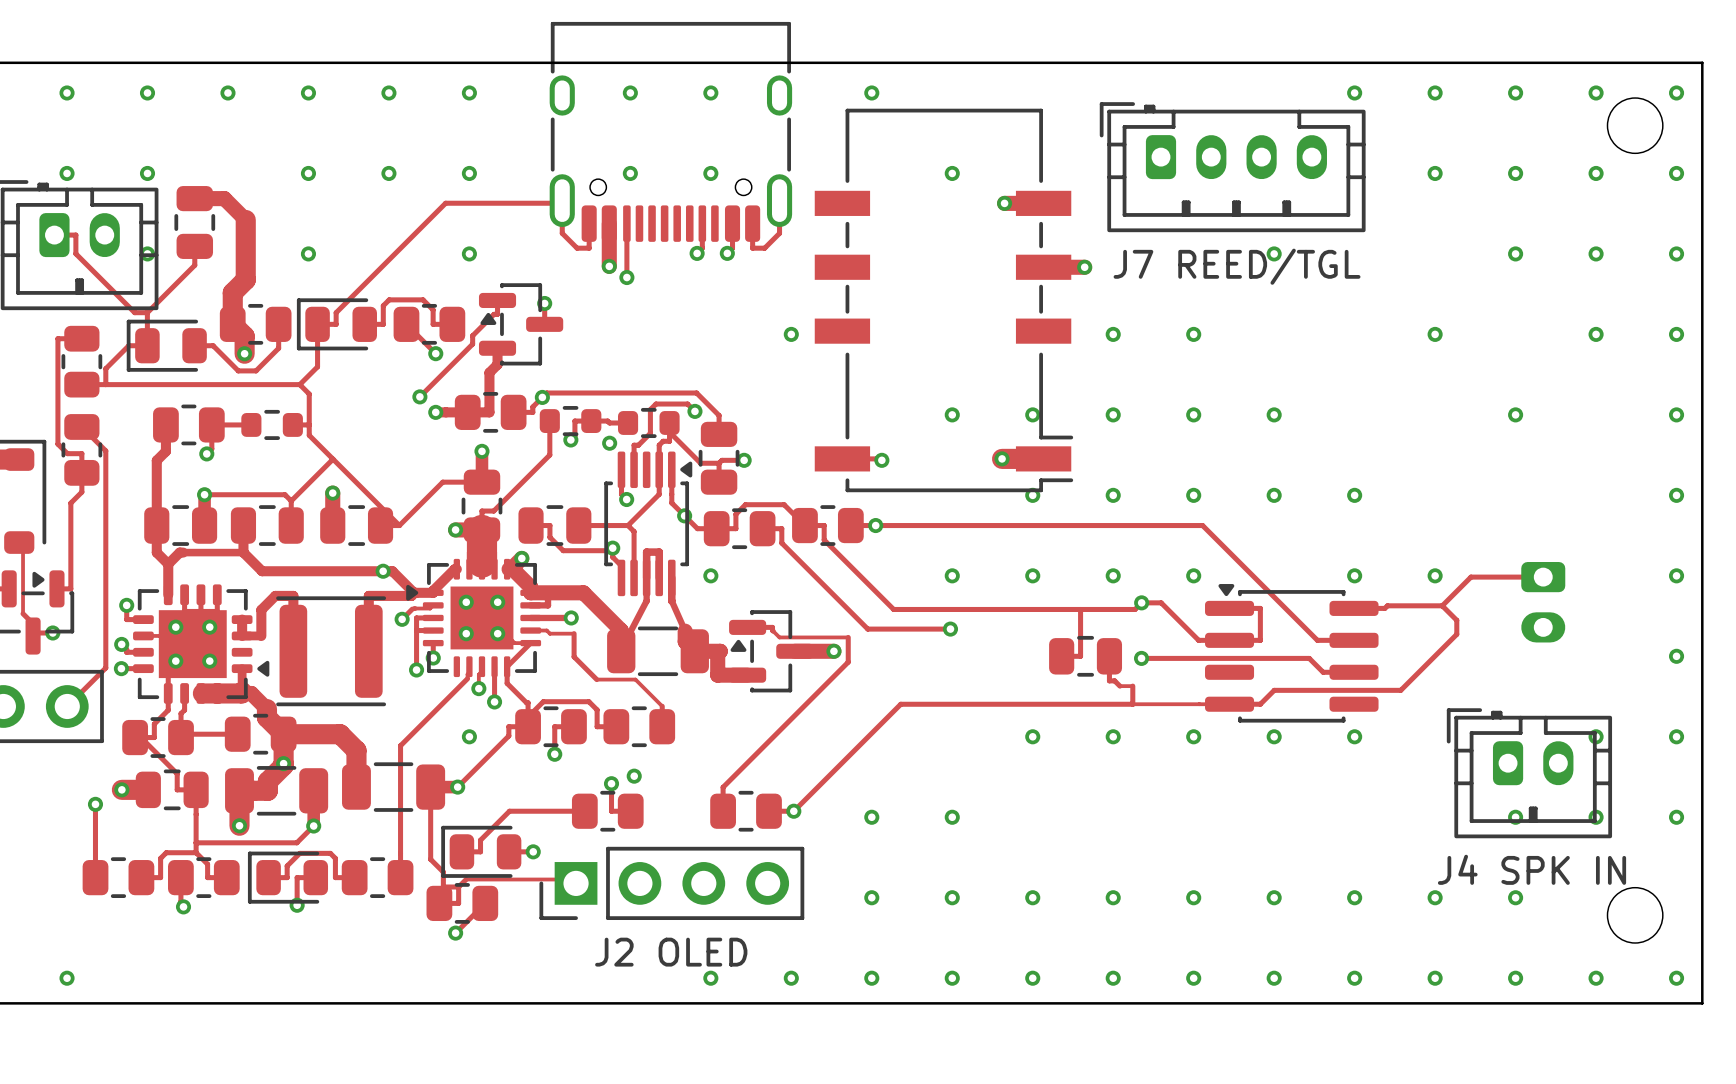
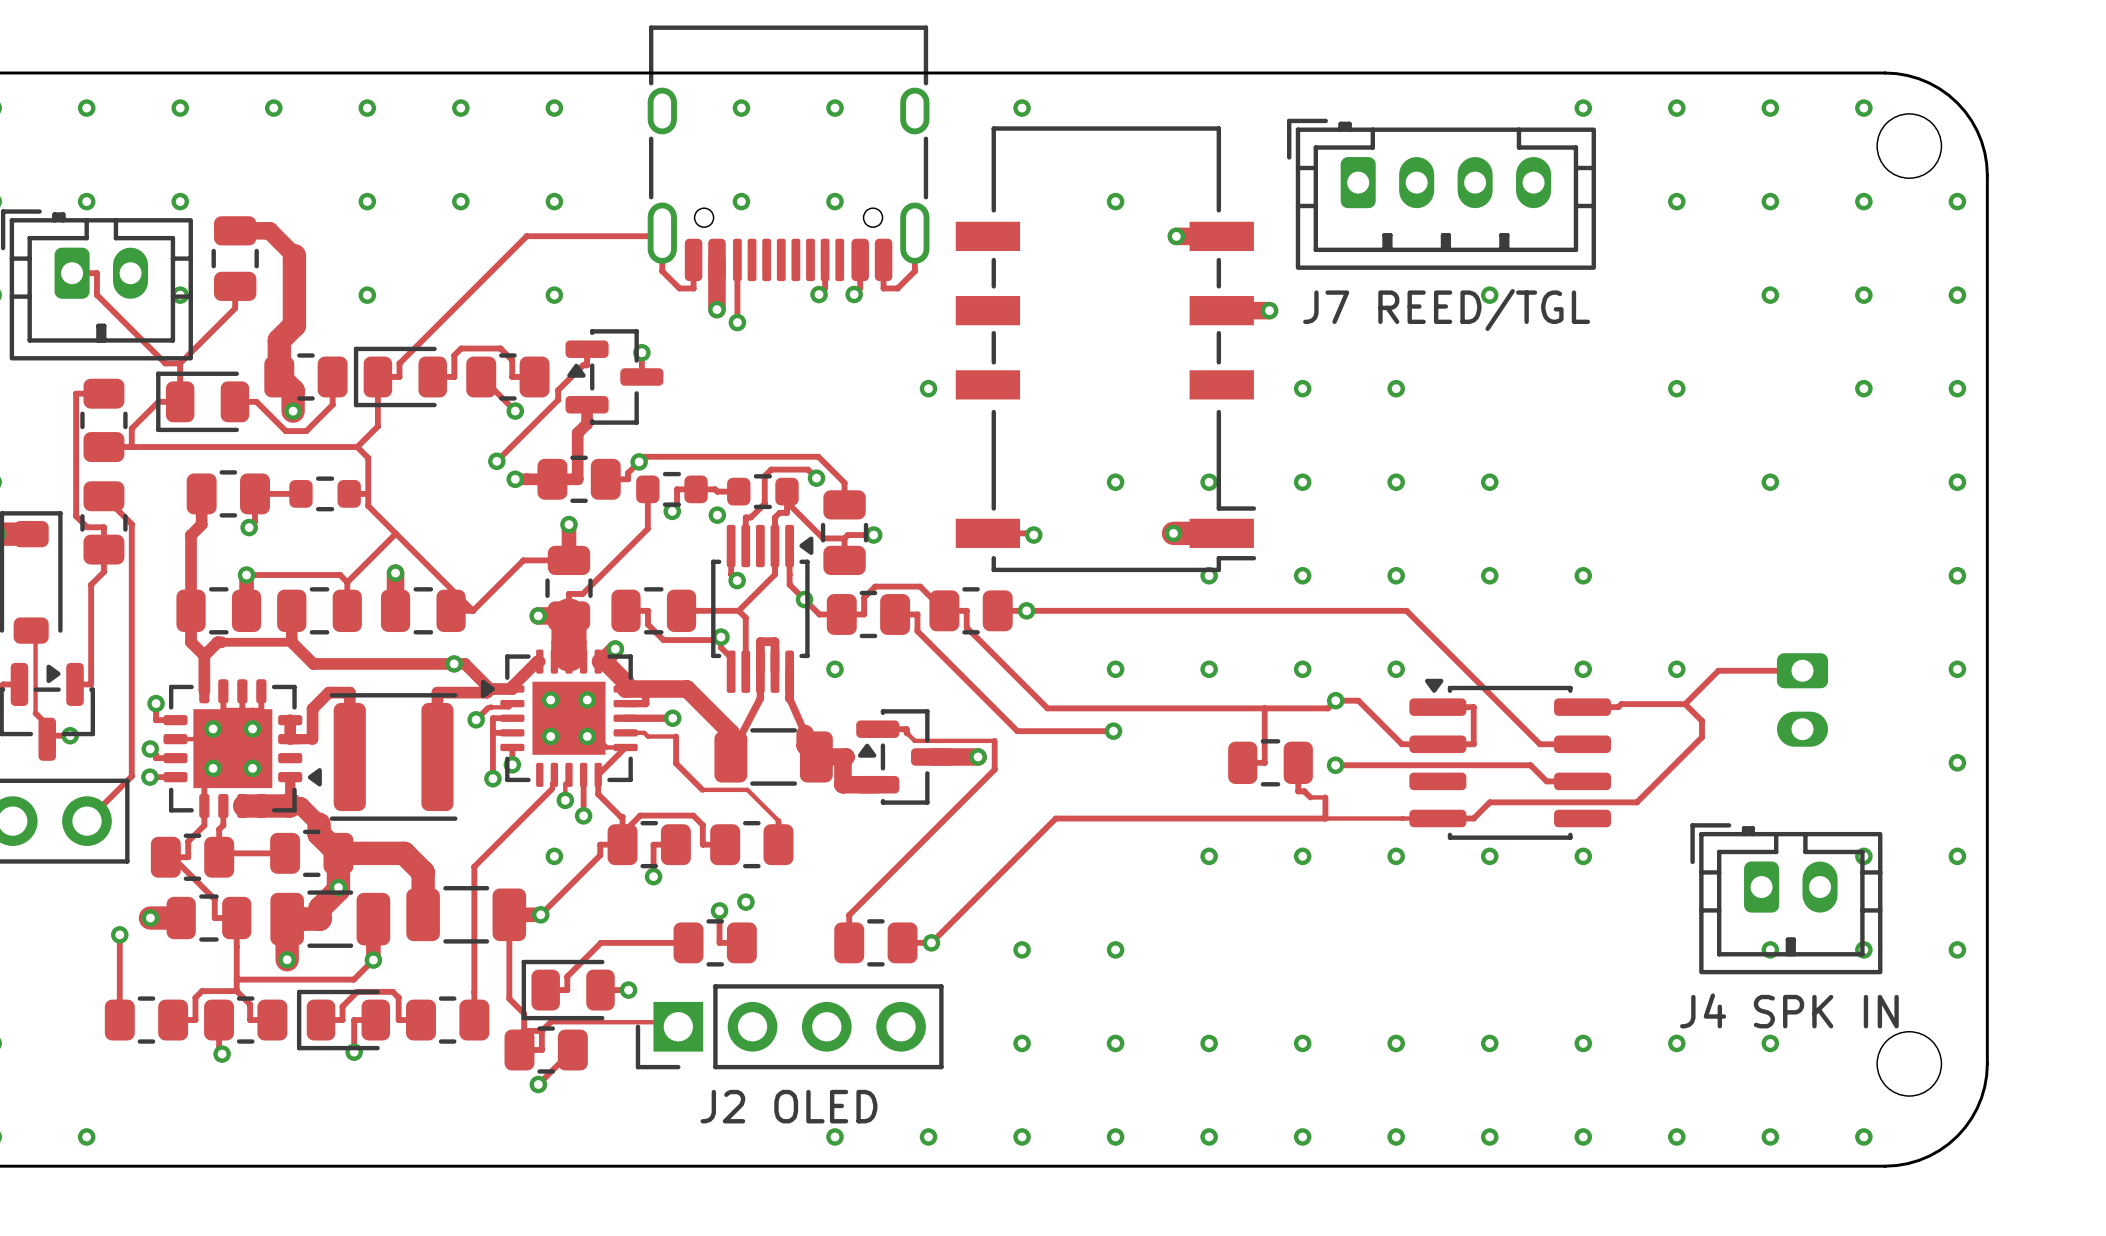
board edge: (1614, 62) (1702, 62) (1702, 150) -> (1885, 72) (1907, 75) (1929, 83) (1957, 102) (1971, 120) (1981, 141) (1987, 175)
via: (1676, 92) -> none
board edge: (1702, 915) (1702, 1003) (1614, 1003) -> (1987, 1063) (1984, 1086) (1977, 1108) (1957, 1136) (1939, 1150) (1918, 1160) (1885, 1166)
via: (1676, 978) -> none

